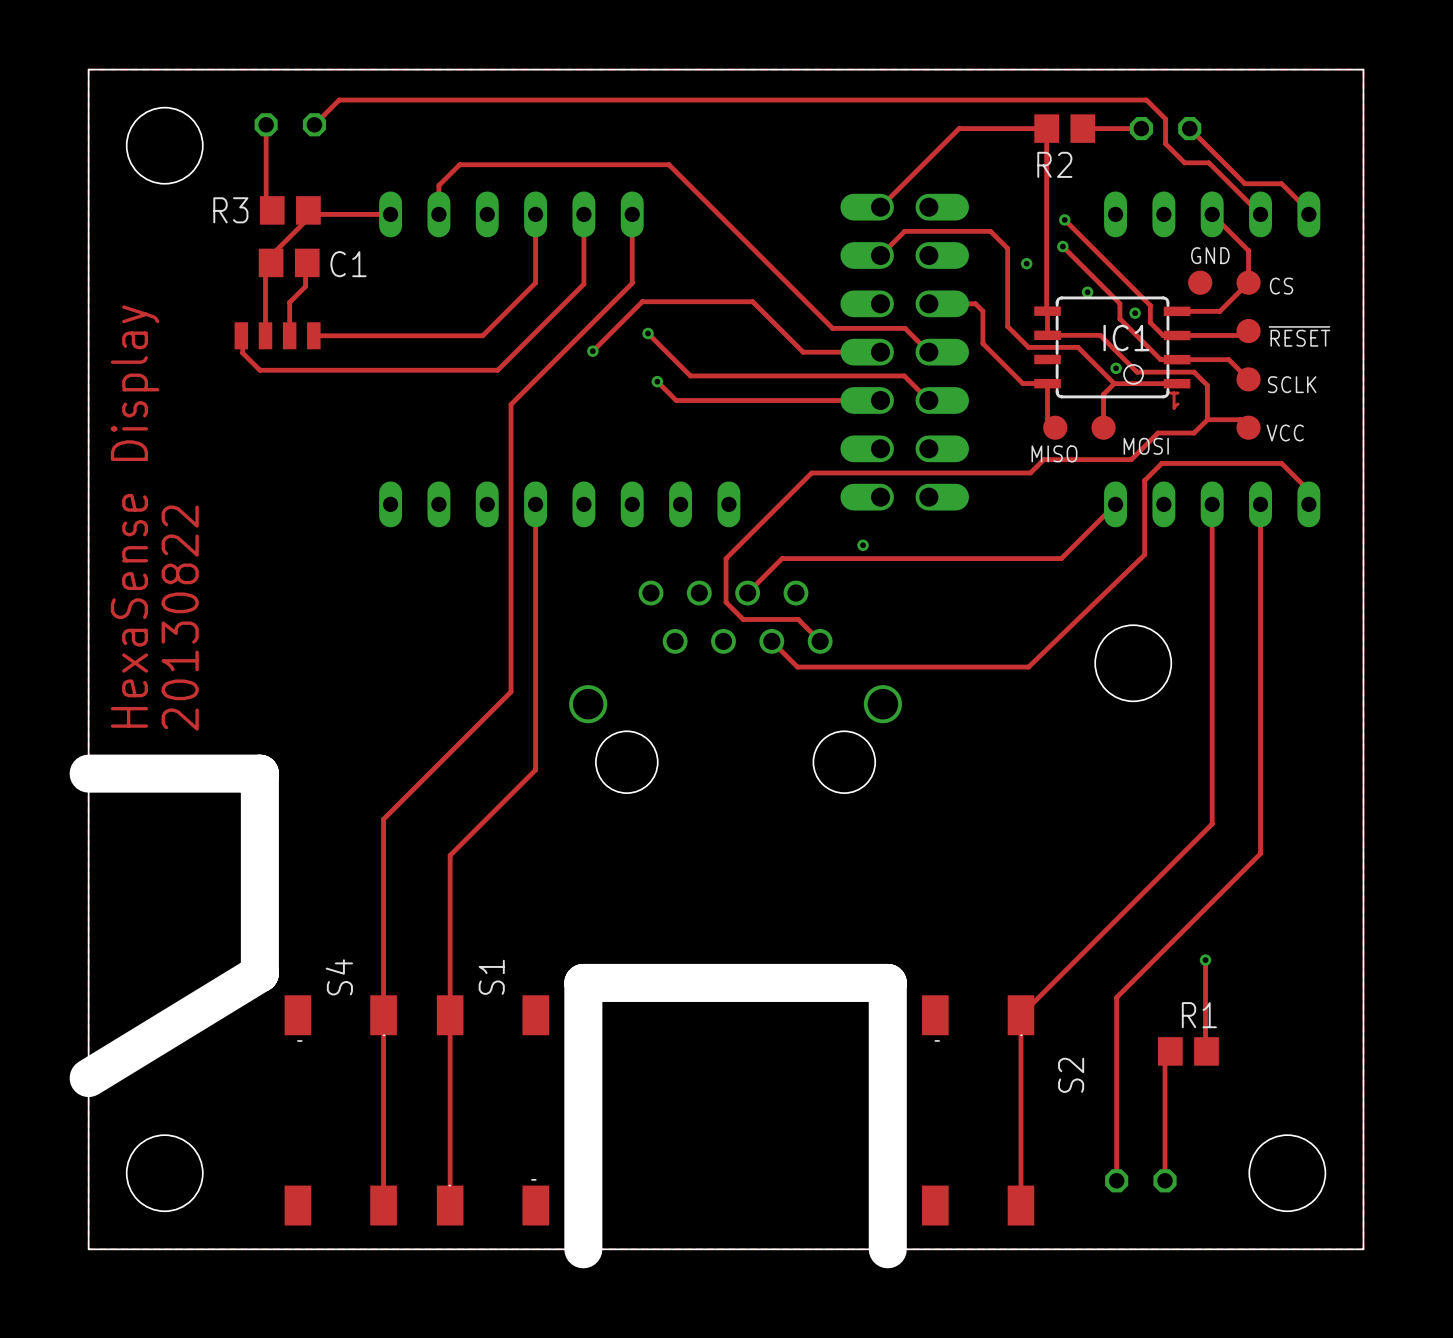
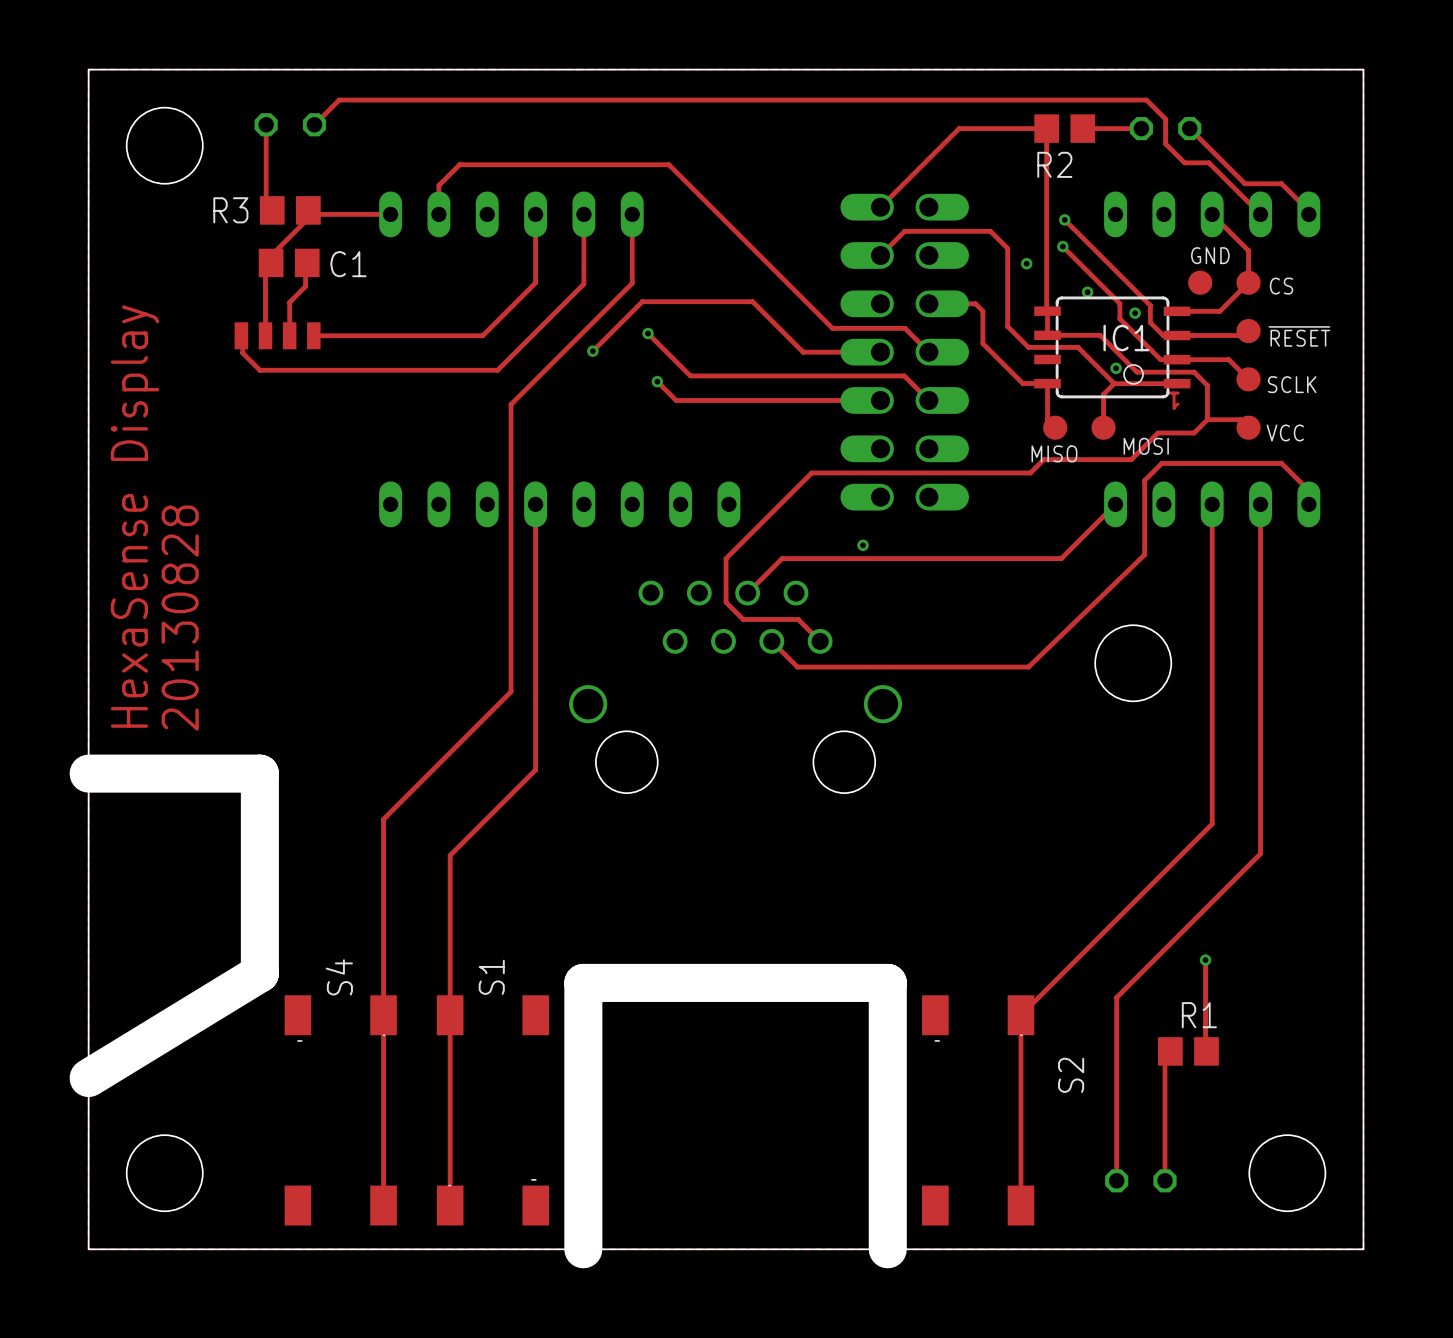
text: 20130822 (180, 618) -> 20130828 (180, 618)

